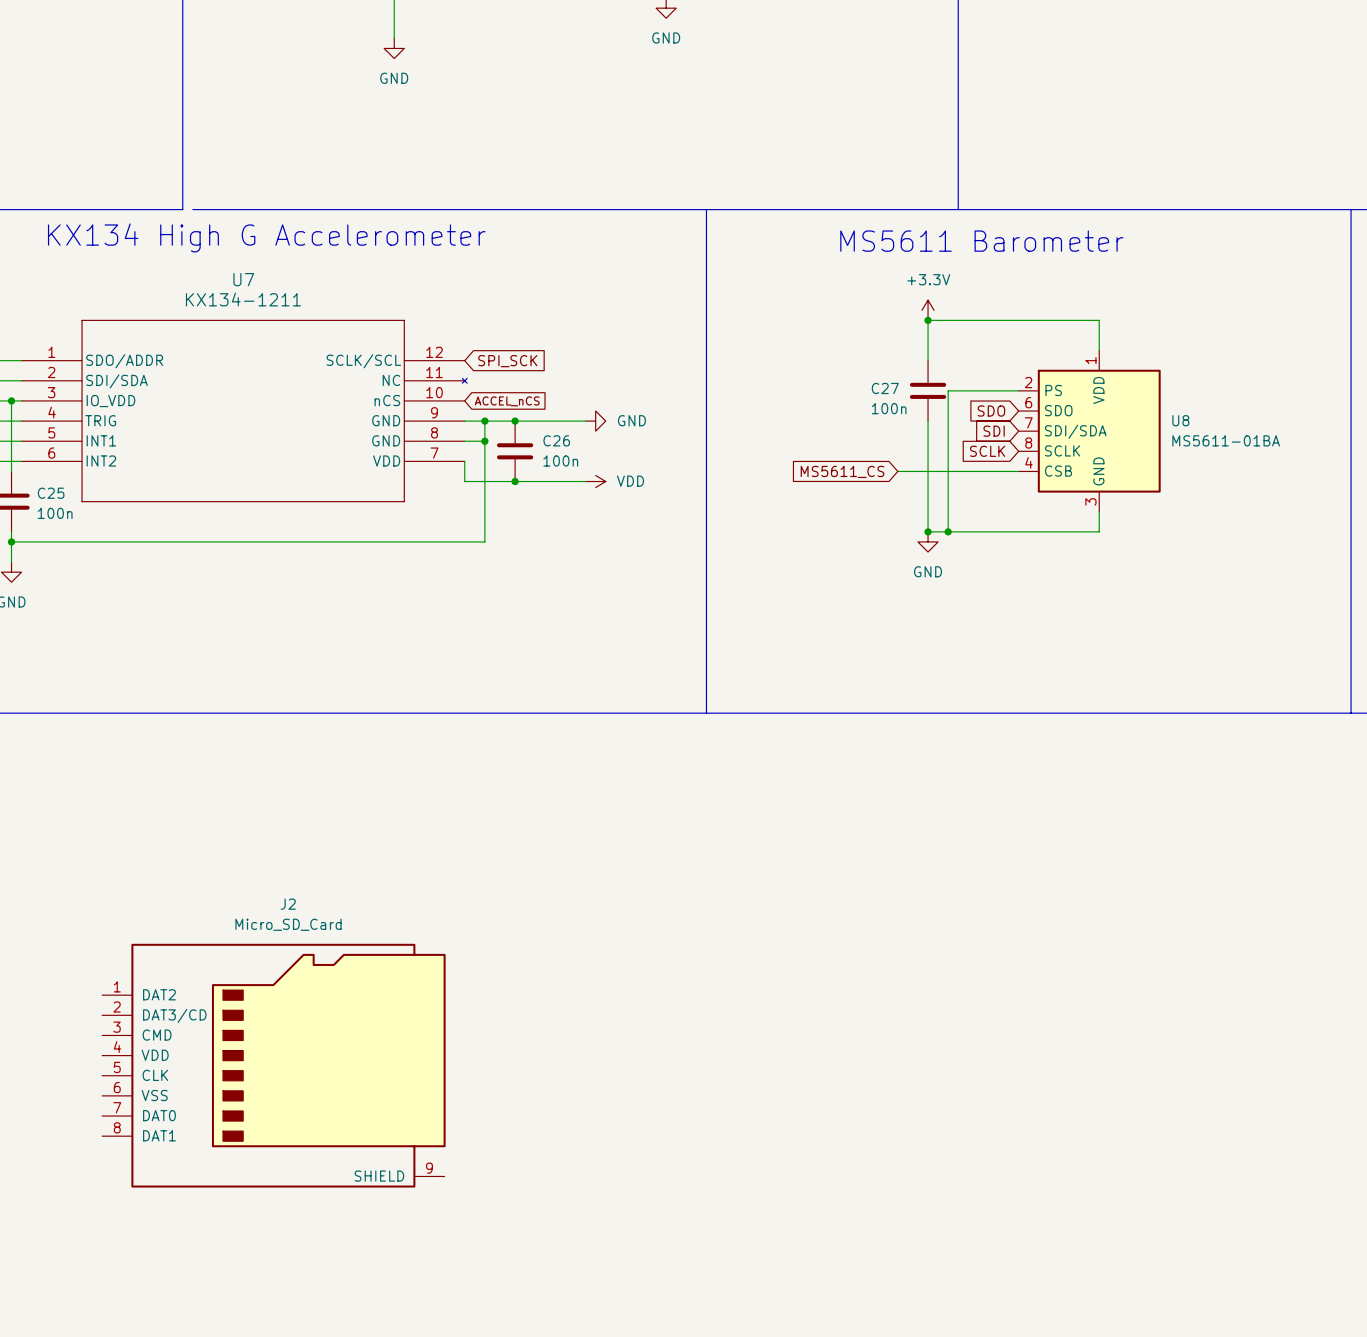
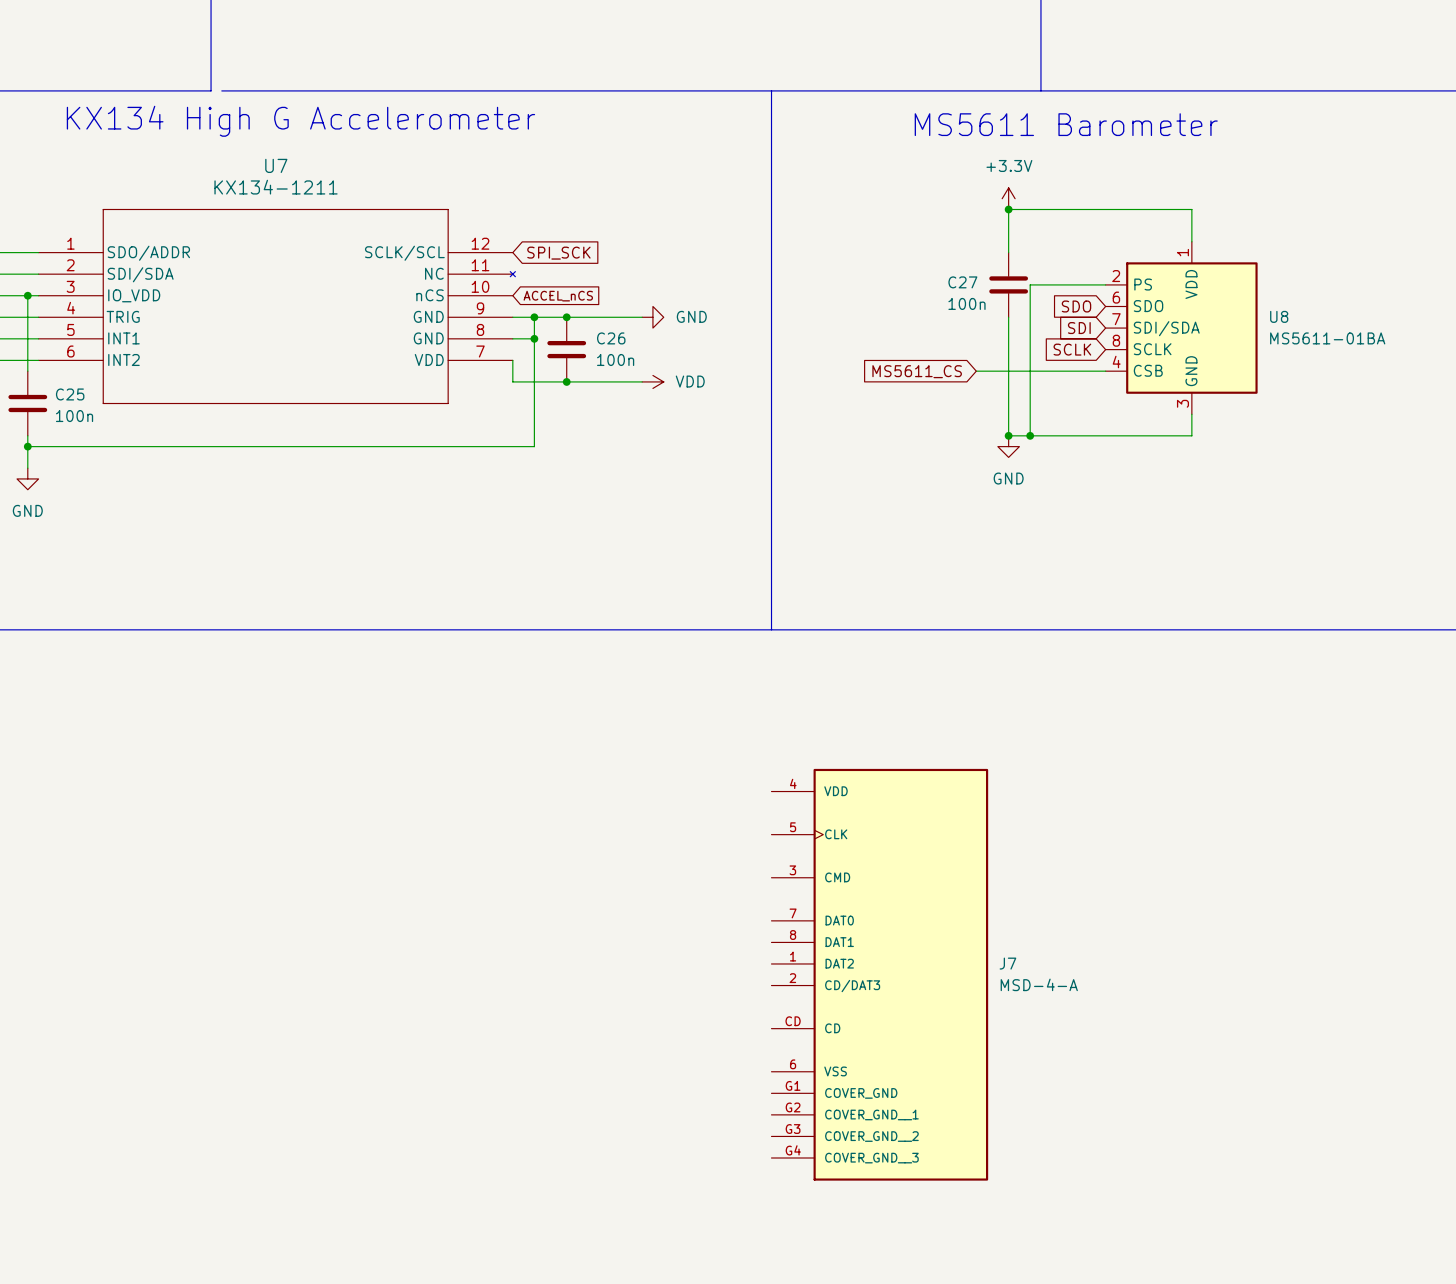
J7: none -> MSD-4-A (879, 974)
J2: Micro_SD_Card (273, 1065) -> none

